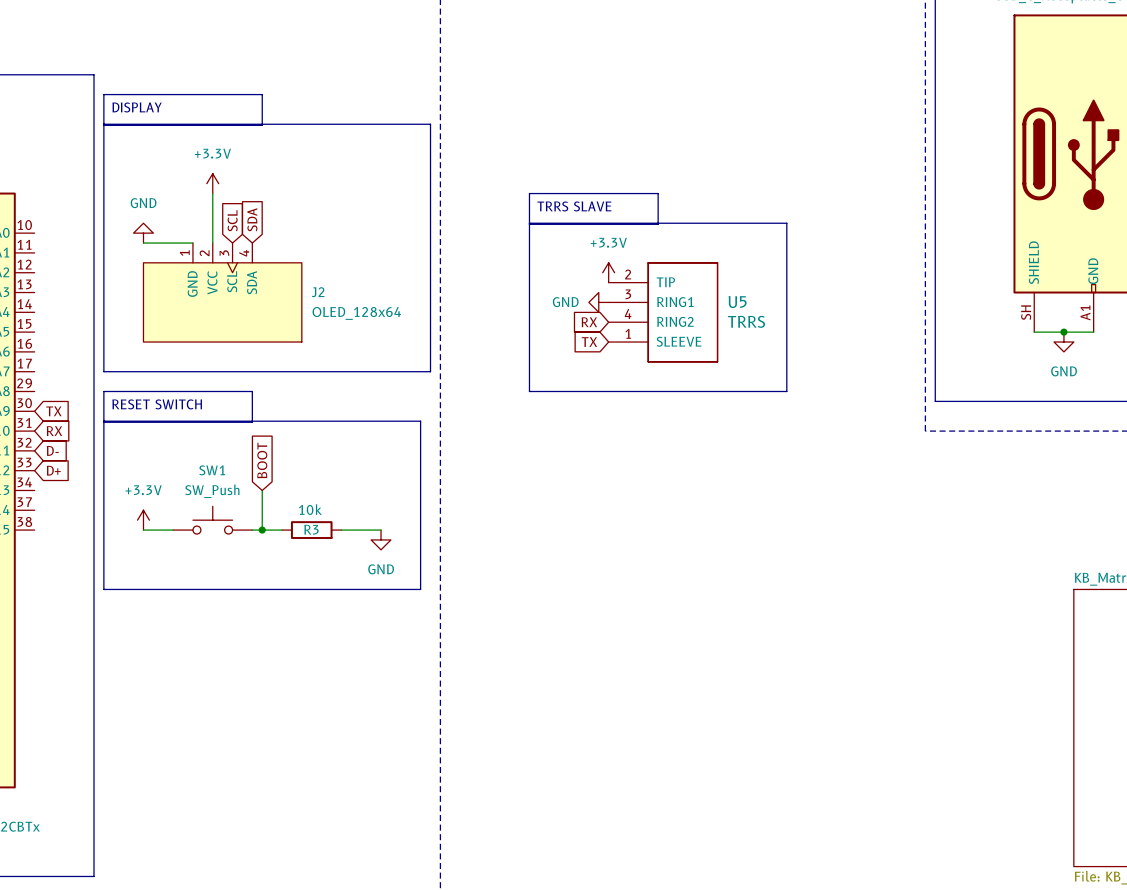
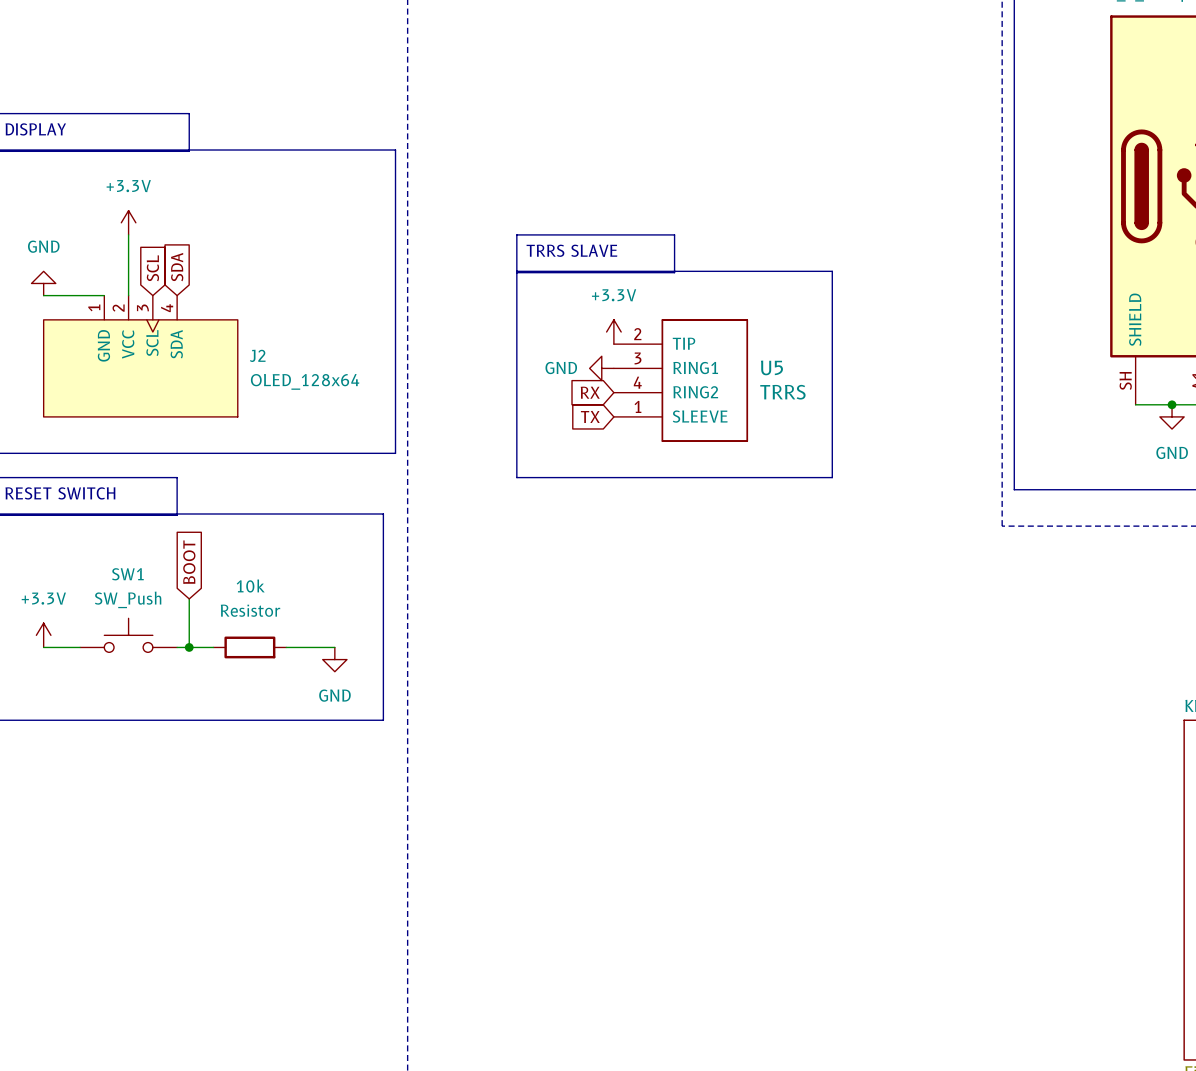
R3 value: 10k (310, 509) -> Resistor (250, 610)
R3 name: R3 (311, 529) -> 10k (250, 586)

